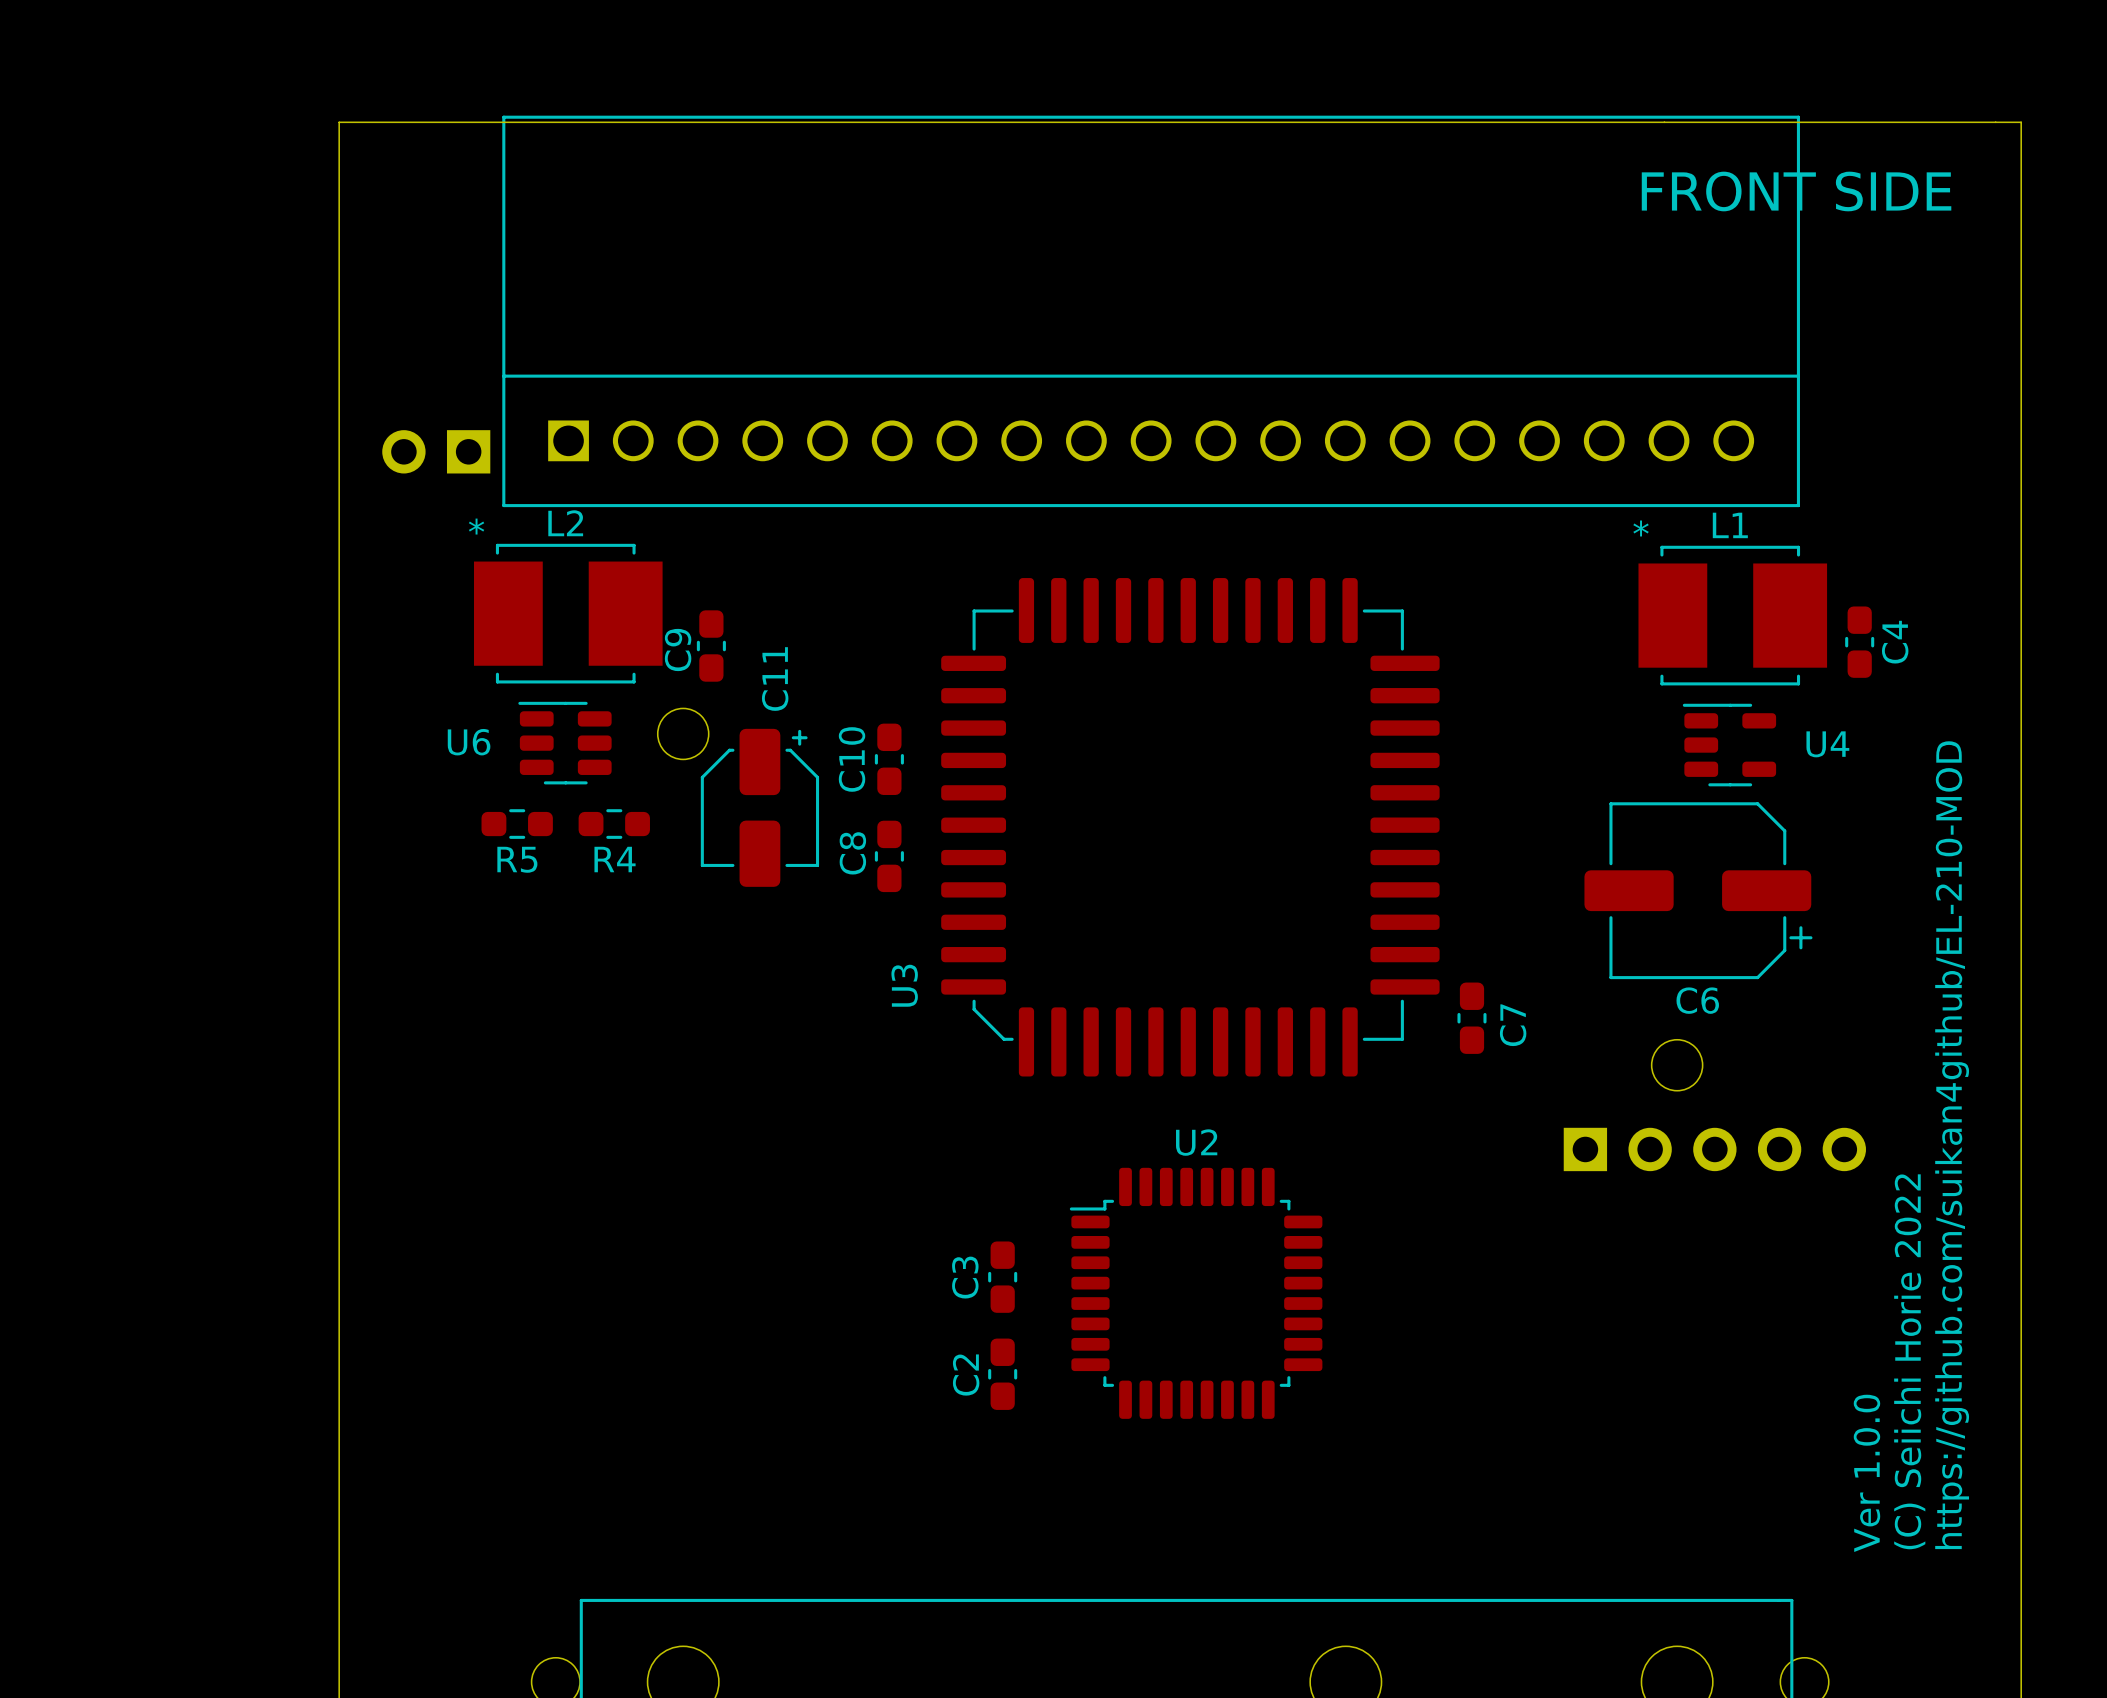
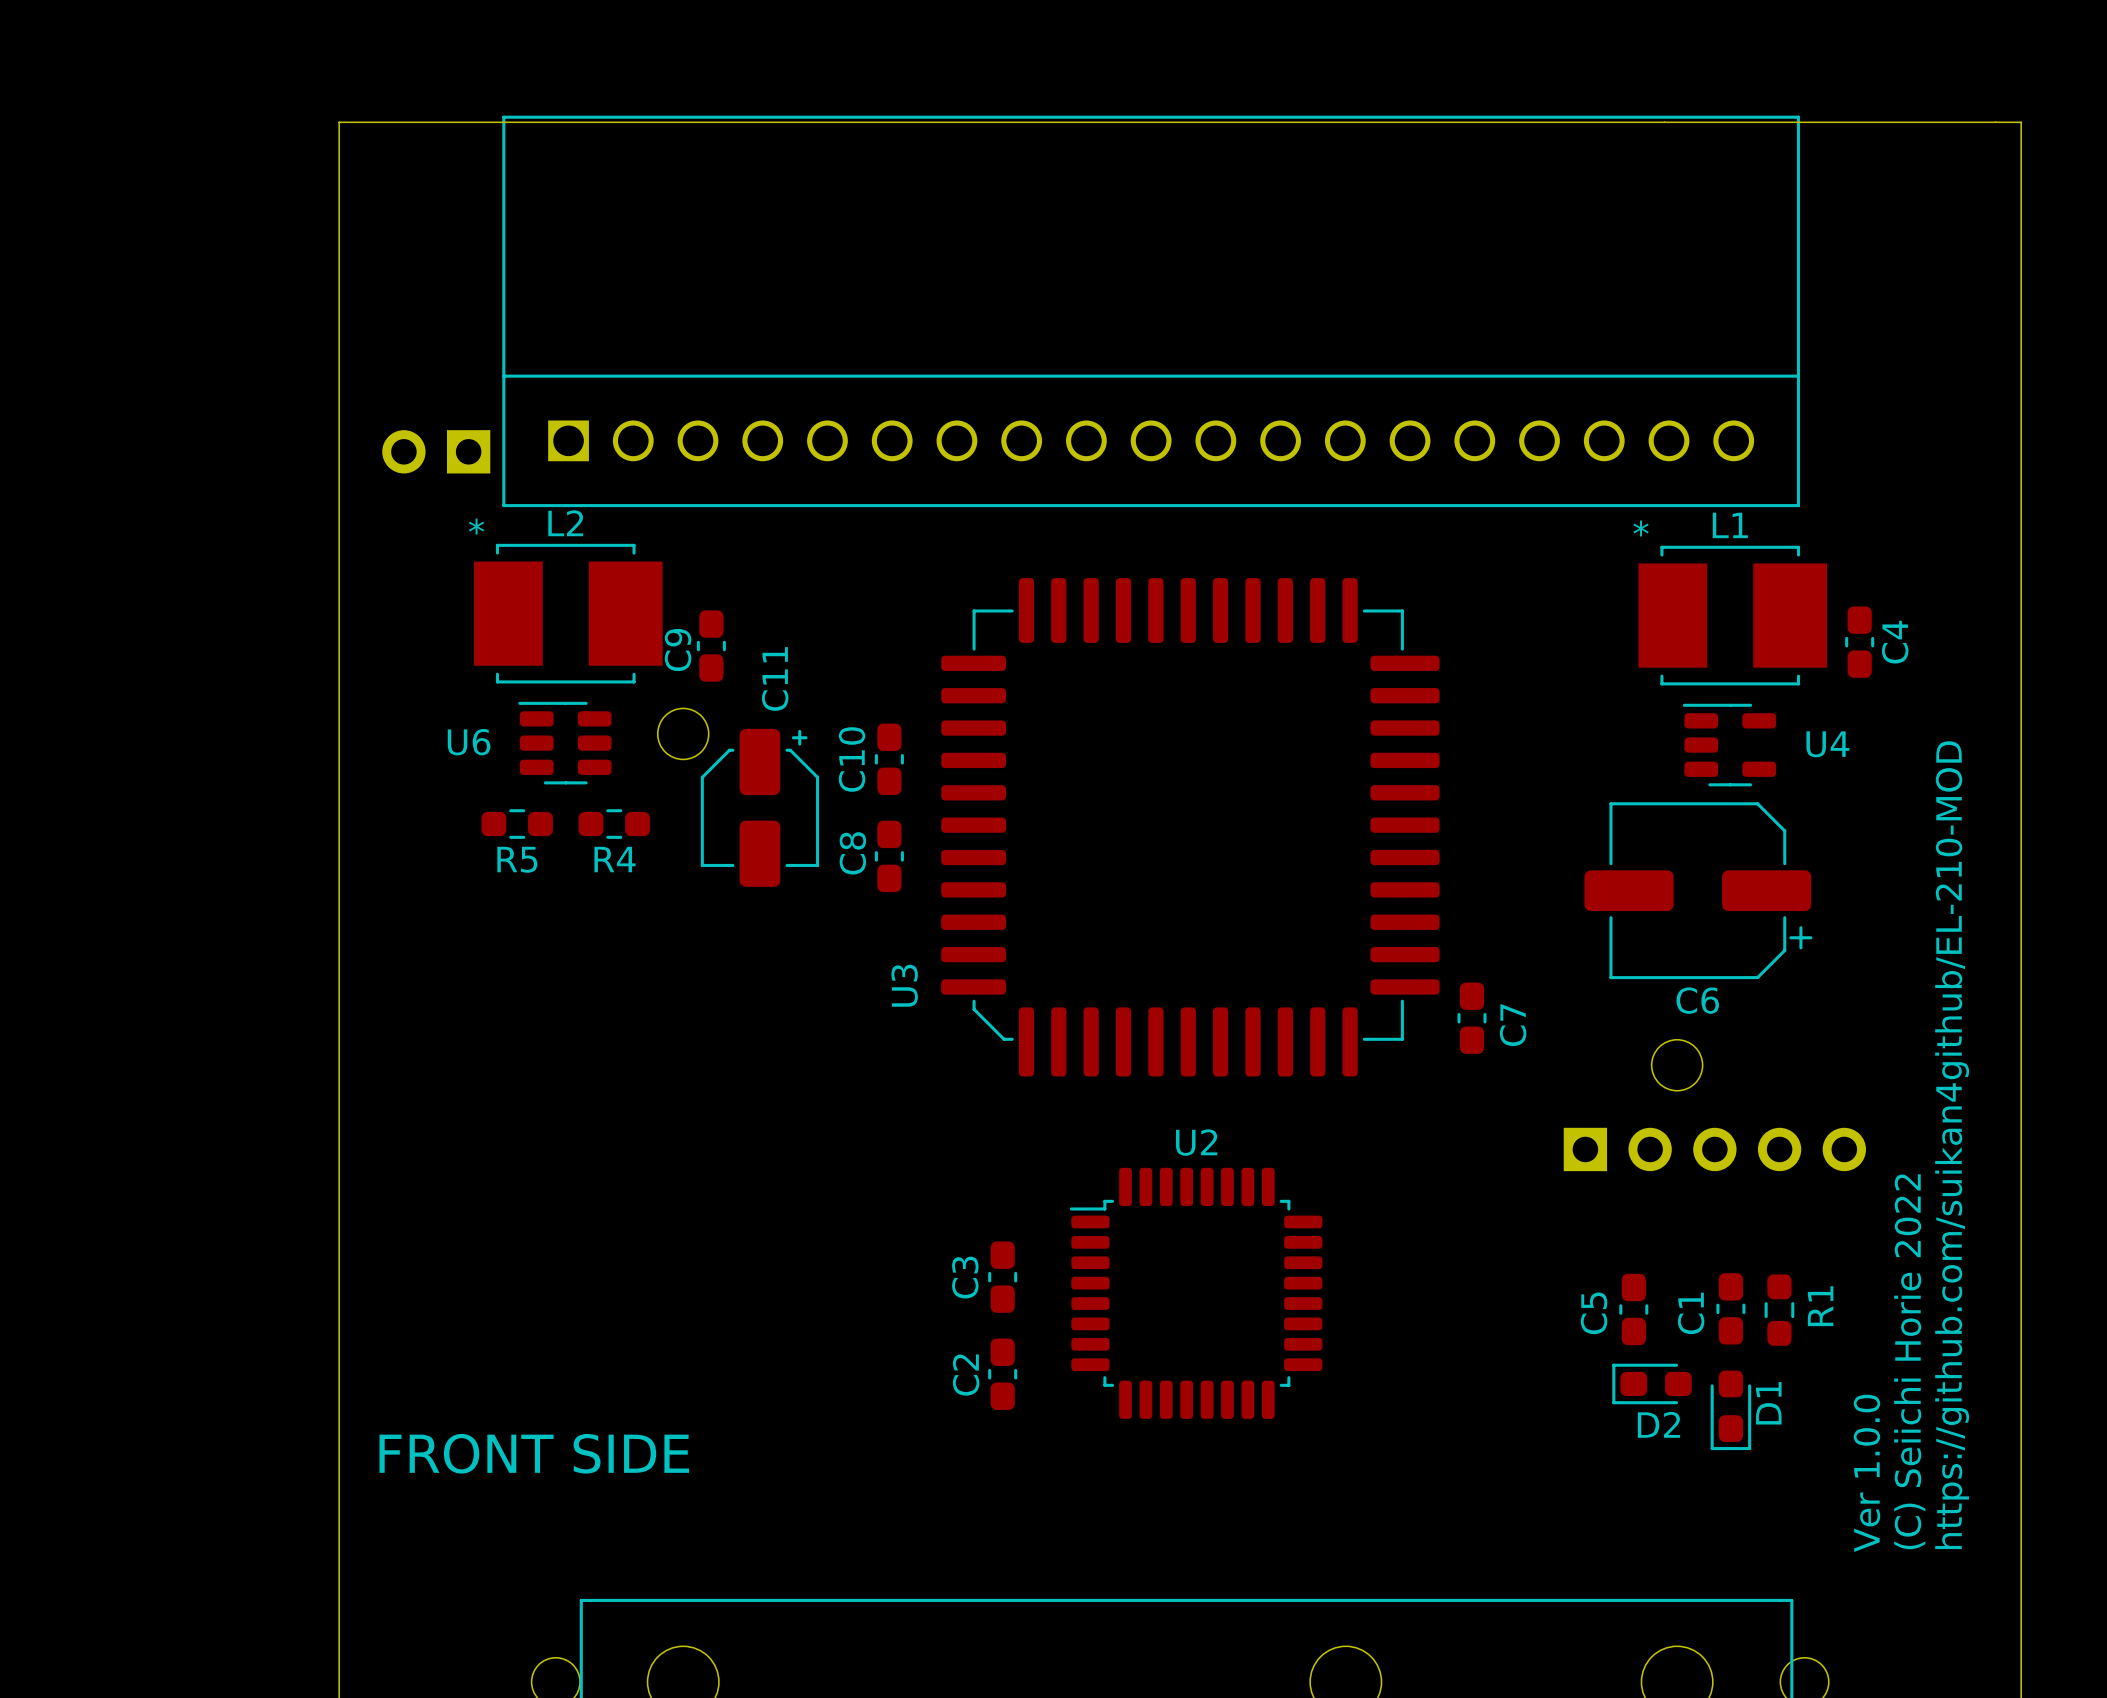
text: FRONT SIDE (1796, 191) -> none
C1: none -> (1730, 1308)
C5: none -> (1633, 1309)
R1: none -> (1779, 1310)
D2: none -> (1652, 1383)
D1: none -> (1730, 1410)
text: none -> FRONT SIDE (534, 1453)

